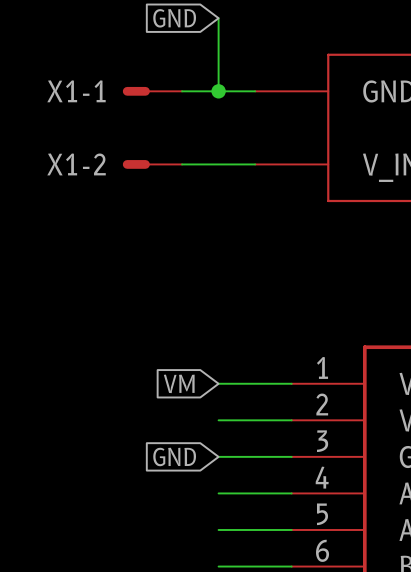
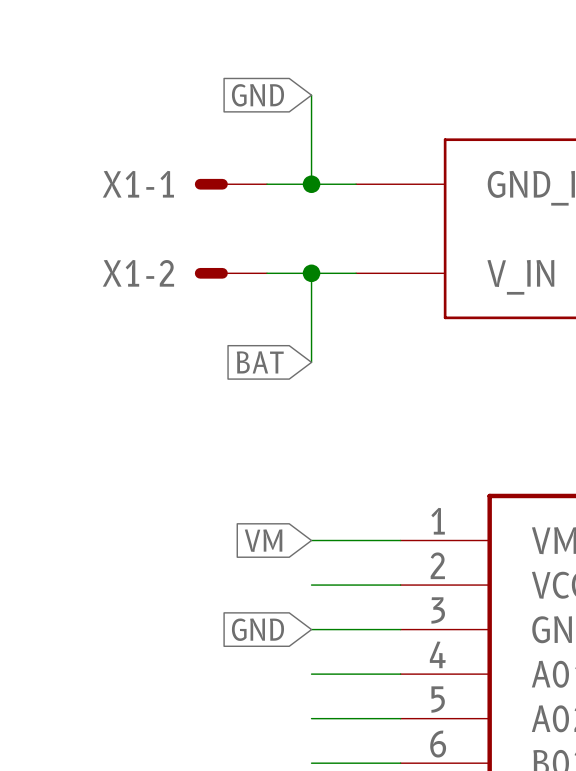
wire: none -> (311, 273) (311, 362)
junction: none -> (311, 273)
global label: none -> BAT (260, 362)

